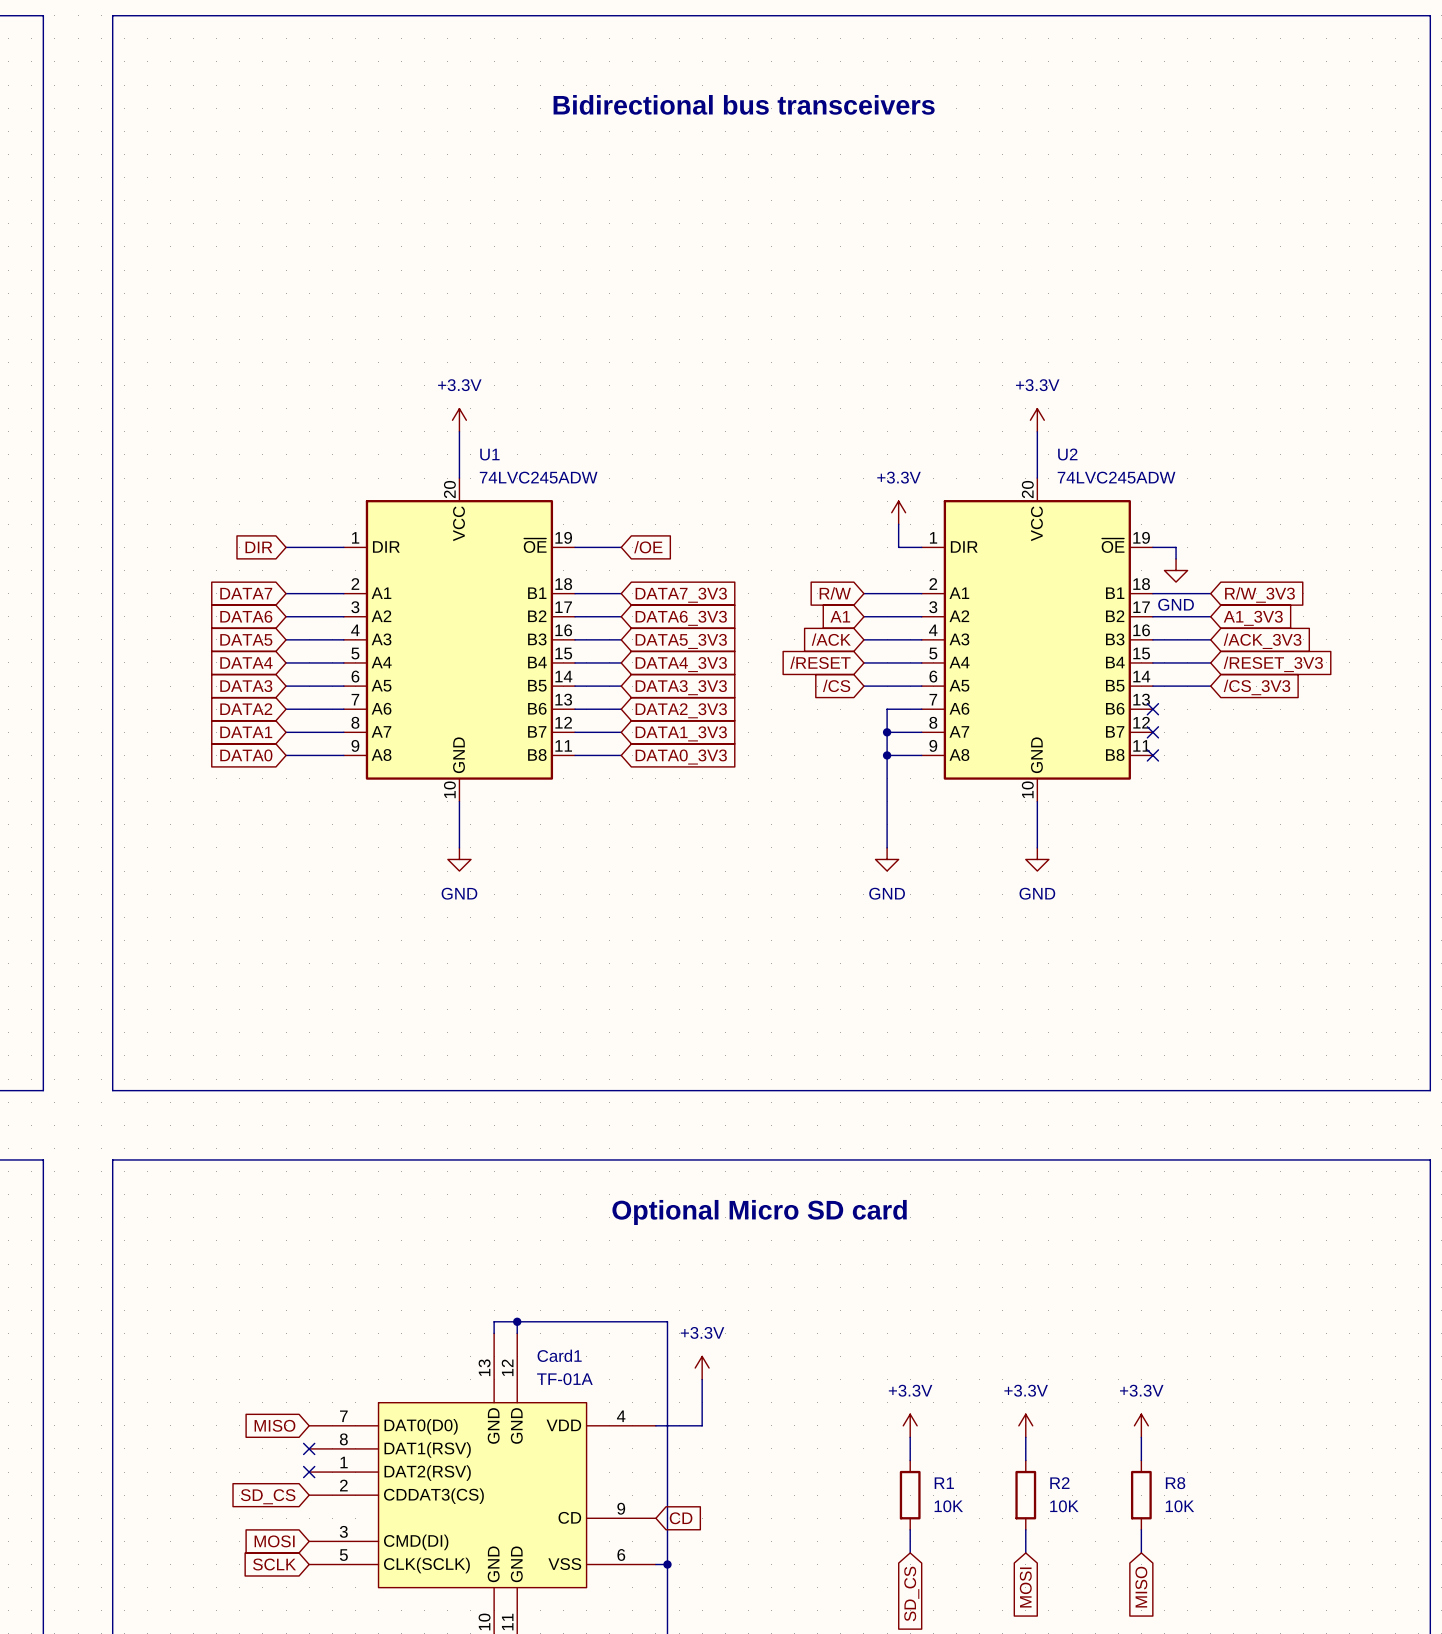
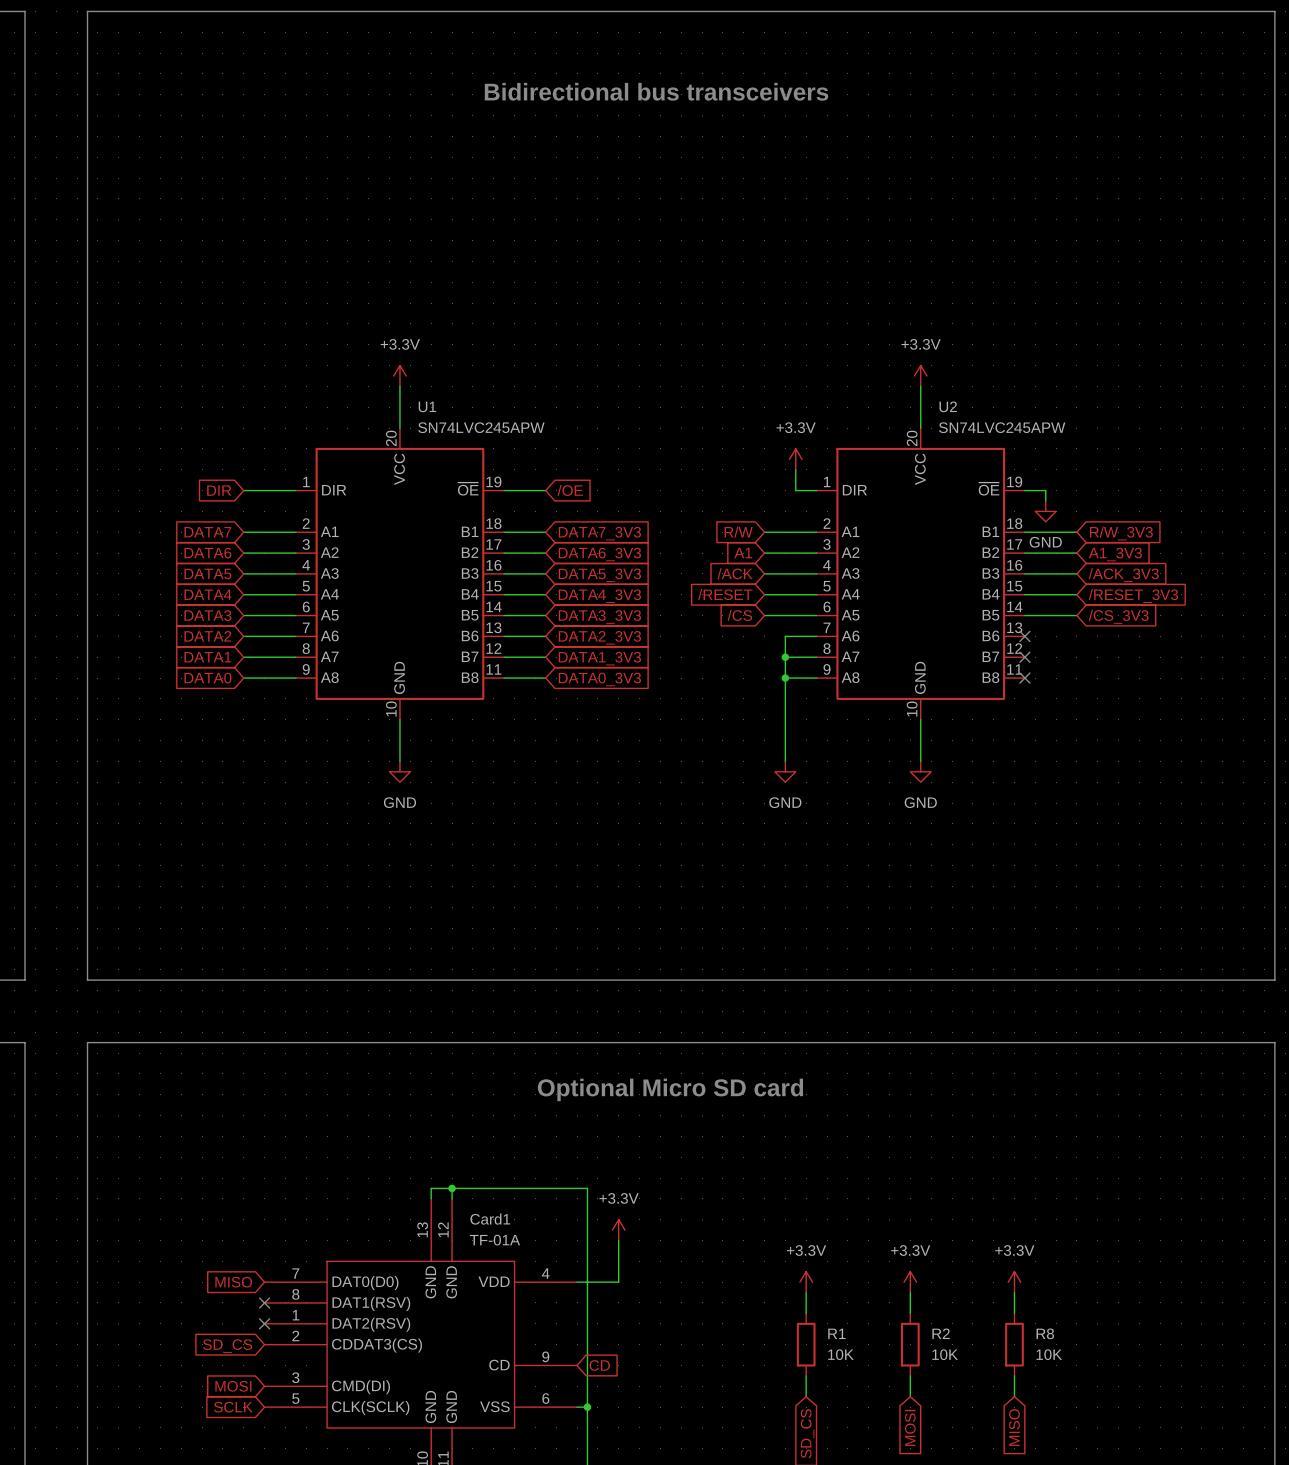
U1 value: 74LVC245ADW (538, 477) -> SN74LVC245APW (481, 427)
U2 value: 74LVC245ADW (1116, 477) -> SN74LVC245APW (1002, 427)

